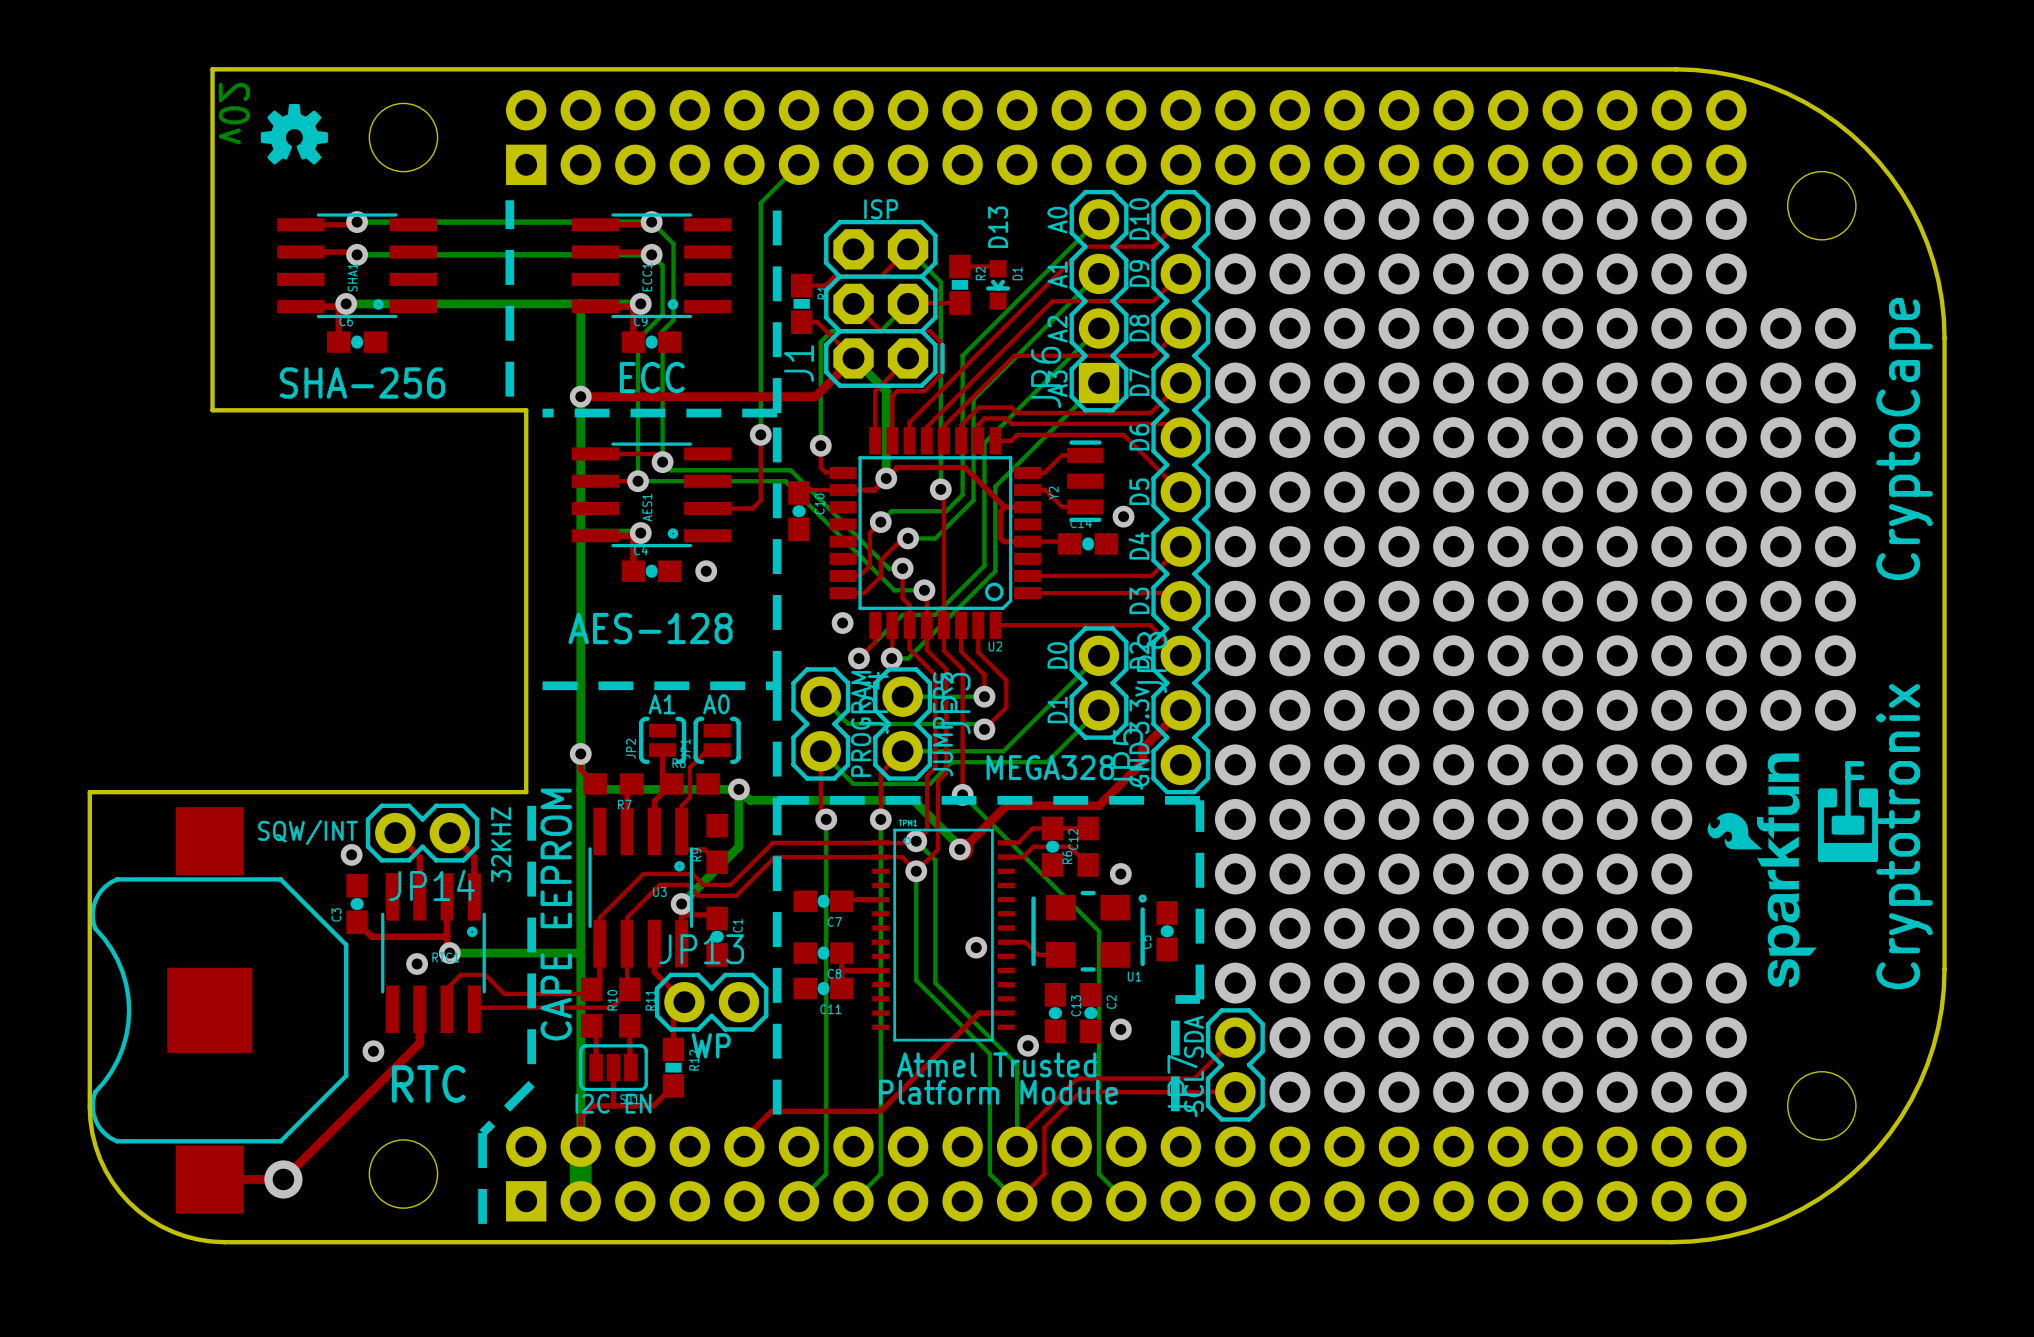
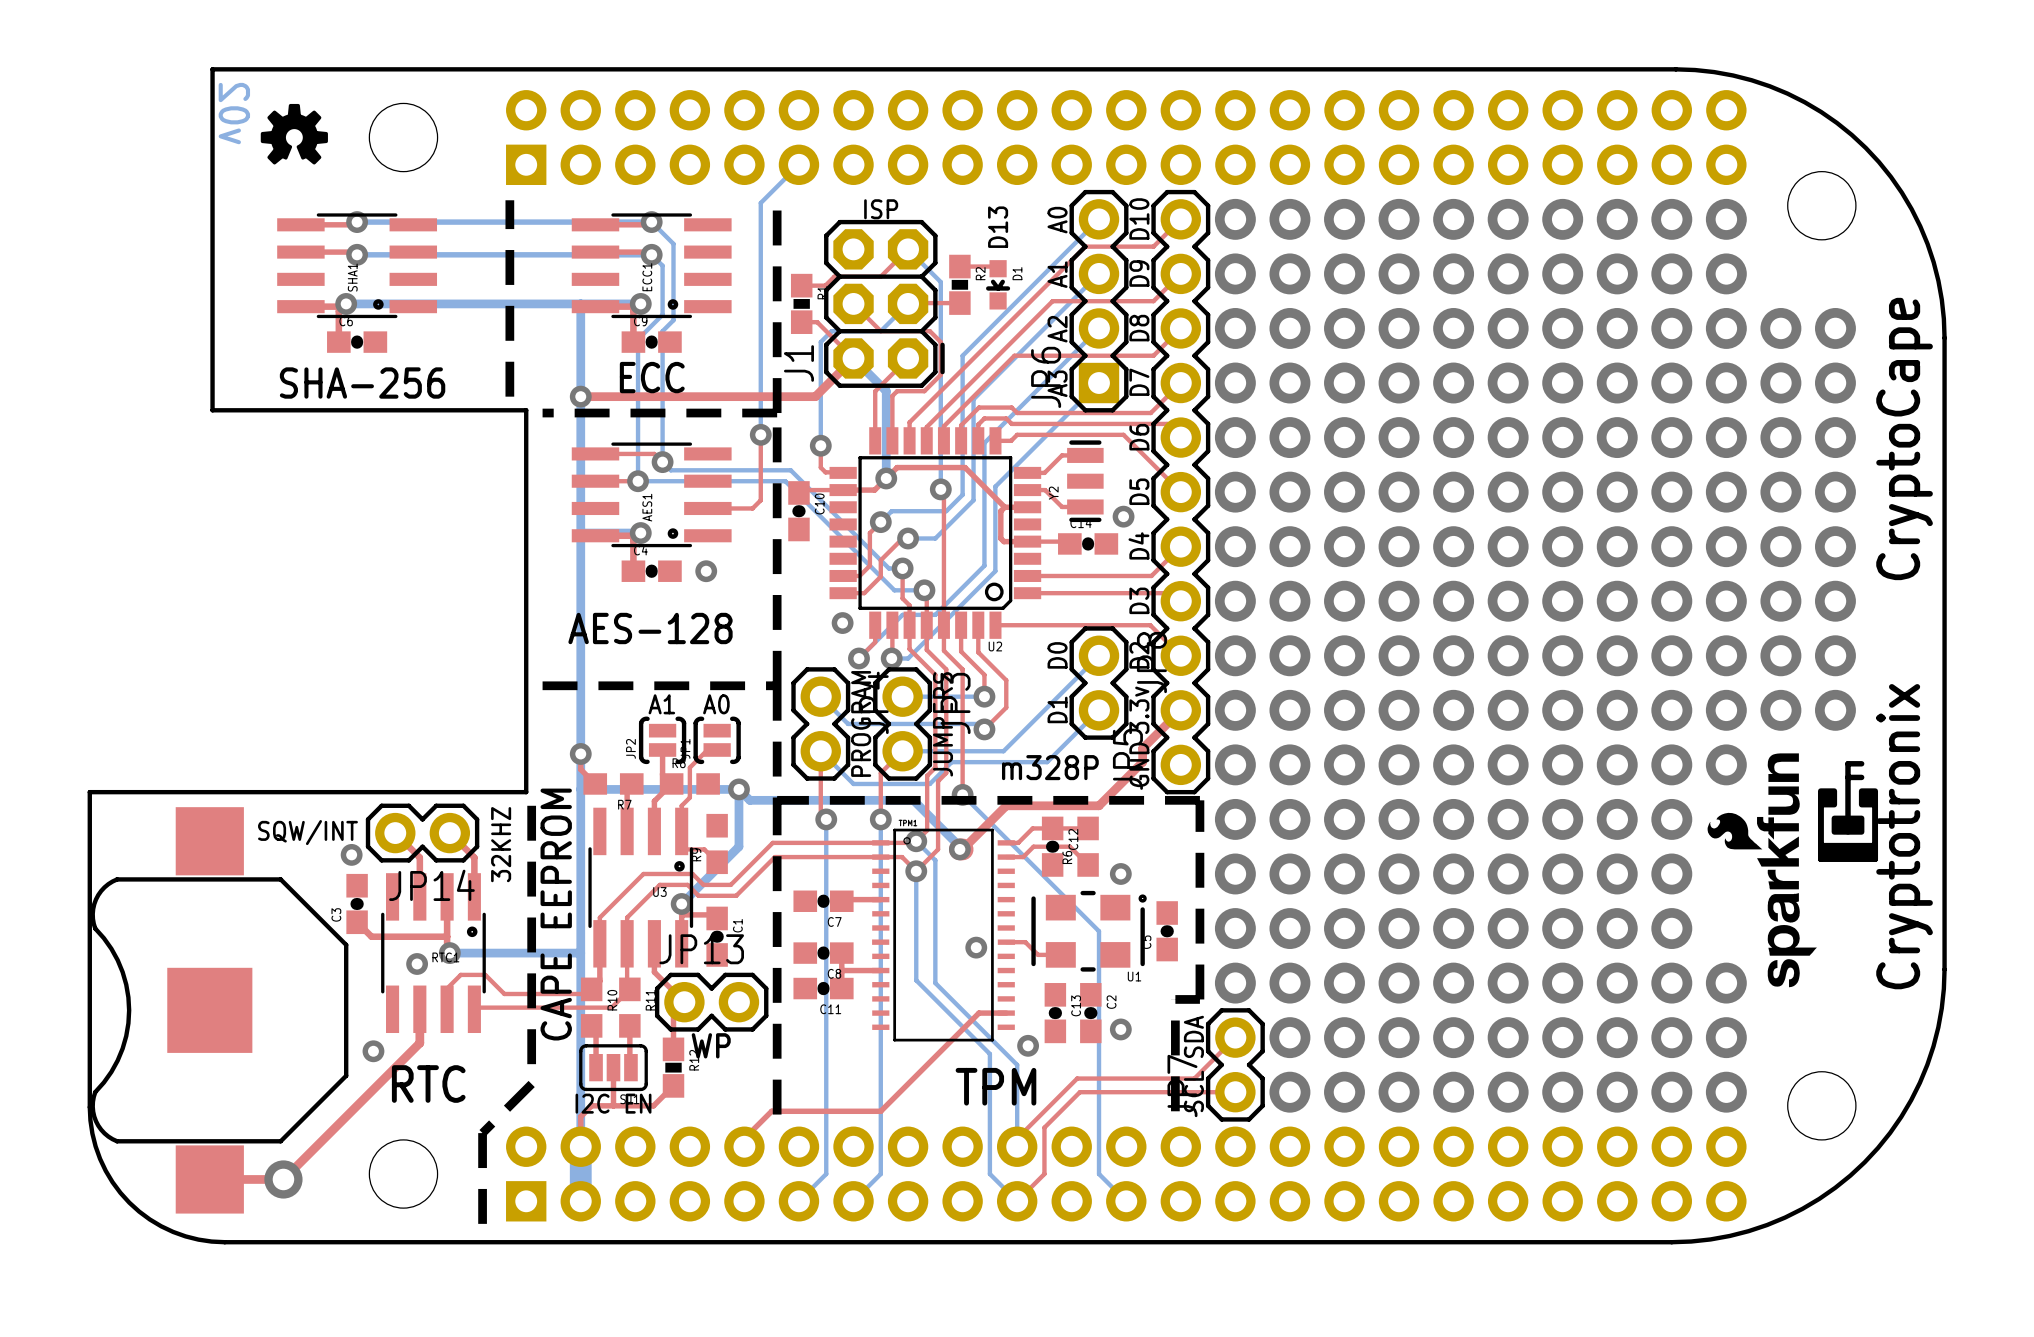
text: MEGA328 (1050, 767) -> m328P (1050, 767)
text: Atmel Trusted (996, 1064) -> none
text: Platform Module (998, 1092) -> TPM (995, 1086)

